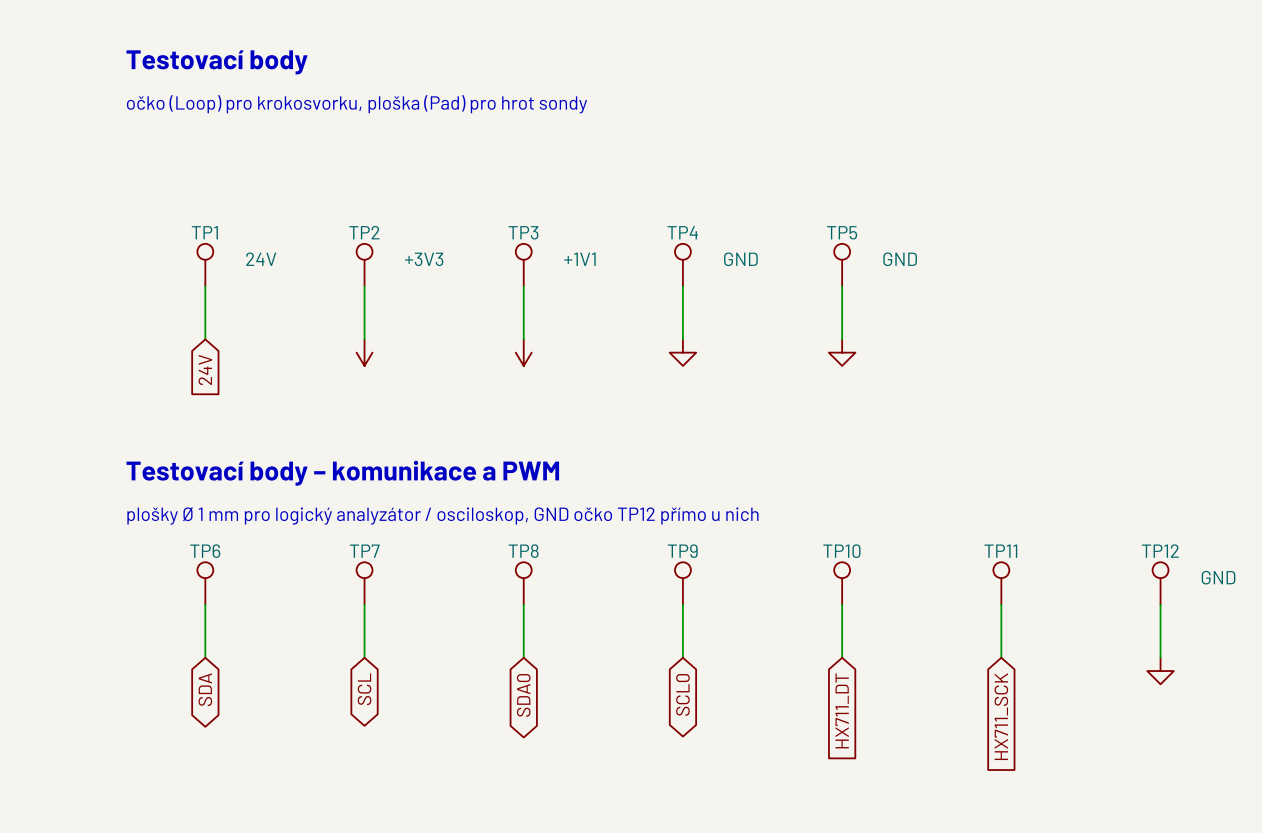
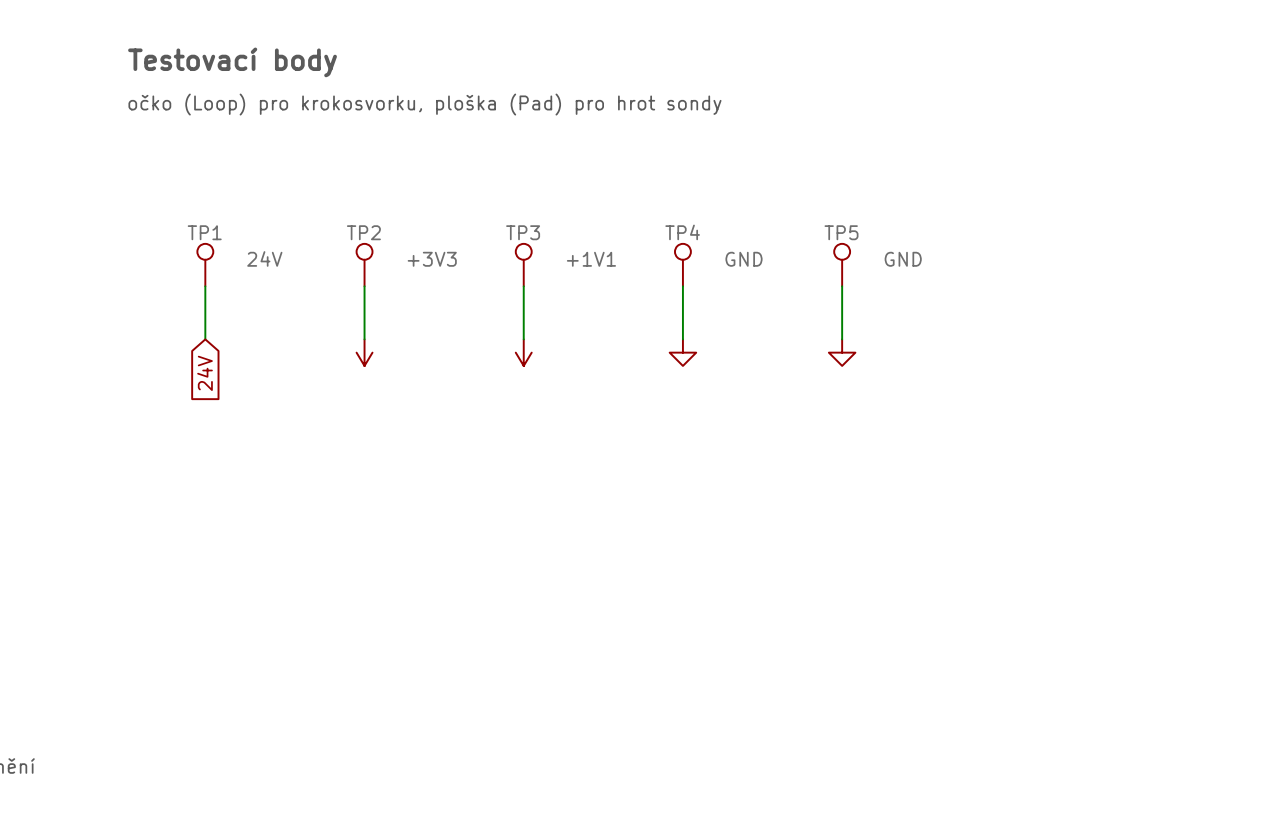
text: Testovací body – komunikace a PWM (342, 473) -> none
text: plošky Ø 1 mm pro logický analyzátor / osciloskop, GND očko TP12 přímo u nich (442, 515) -> none
TP6: (205, 583) -> none
TP7: (364, 583) -> none
TP8: (523, 583) -> none
TP9: (682, 583) -> none
TP10: (842, 583) -> none
TP11: (1001, 583) -> none
TP12: GND (1160, 583) -> none
wire: (205, 604) (205, 657) -> none
wire: (364, 604) (364, 657) -> none
wire: (523, 604) (523, 657) -> none
wire: (682, 604) (682, 657) -> none
wire: (842, 604) (842, 657) -> none
wire: (1001, 604) (1001, 657) -> none
wire: (1160, 604) (1160, 657) -> none
power symbol: (1160, 671) -> none
global label: SDA (205, 689) -> none
global label: SCL (364, 689) -> none
global label: SCL0 (682, 694) -> none
global label: SDA0 (523, 695) -> none
global label: HX711_DT (842, 710) -> none
global label: HX711_SCK (1001, 716) -> none

